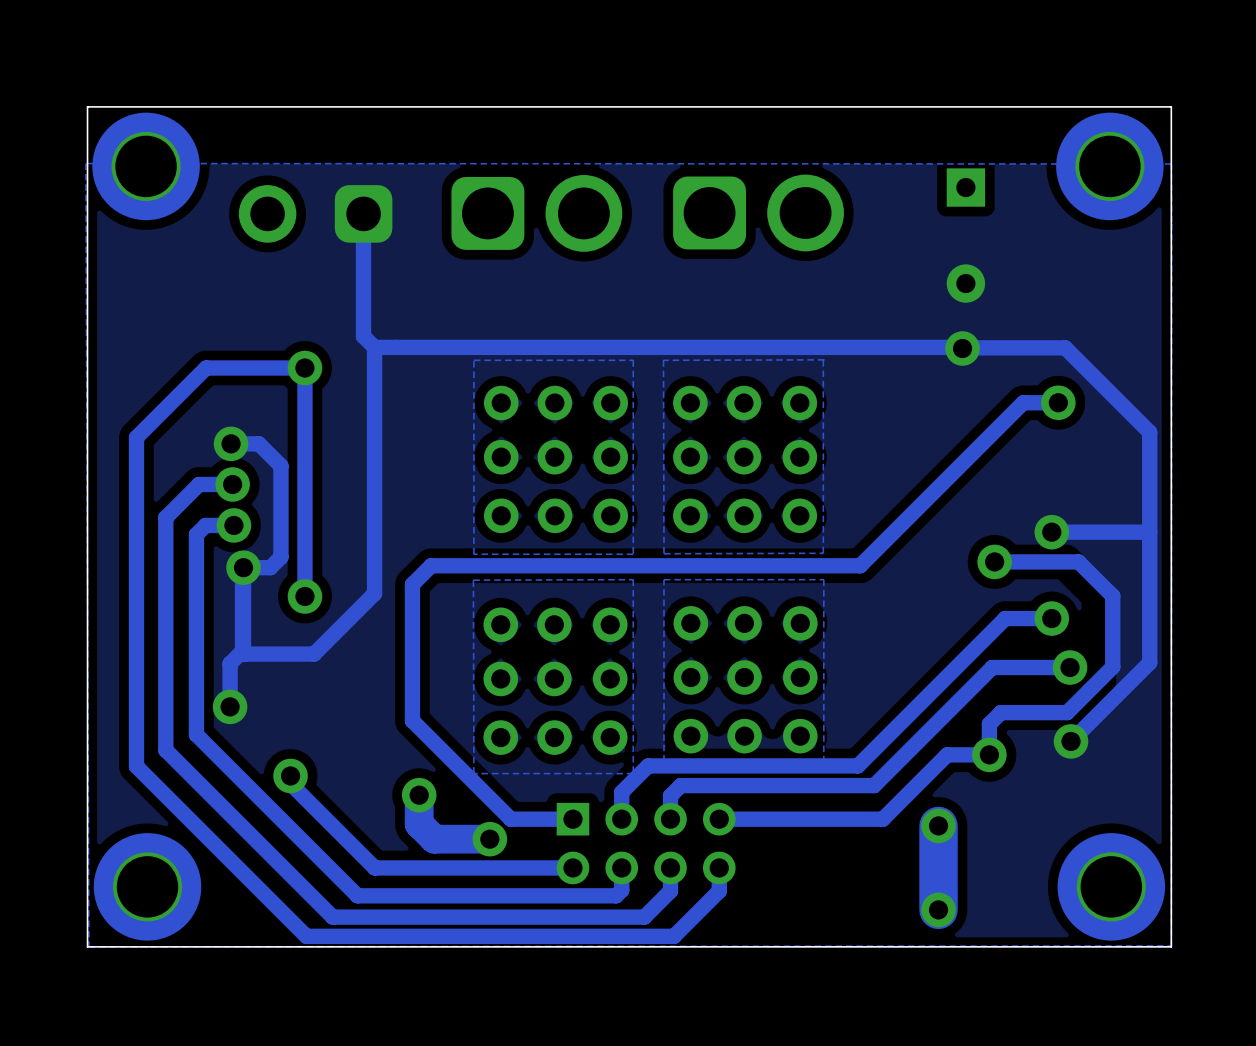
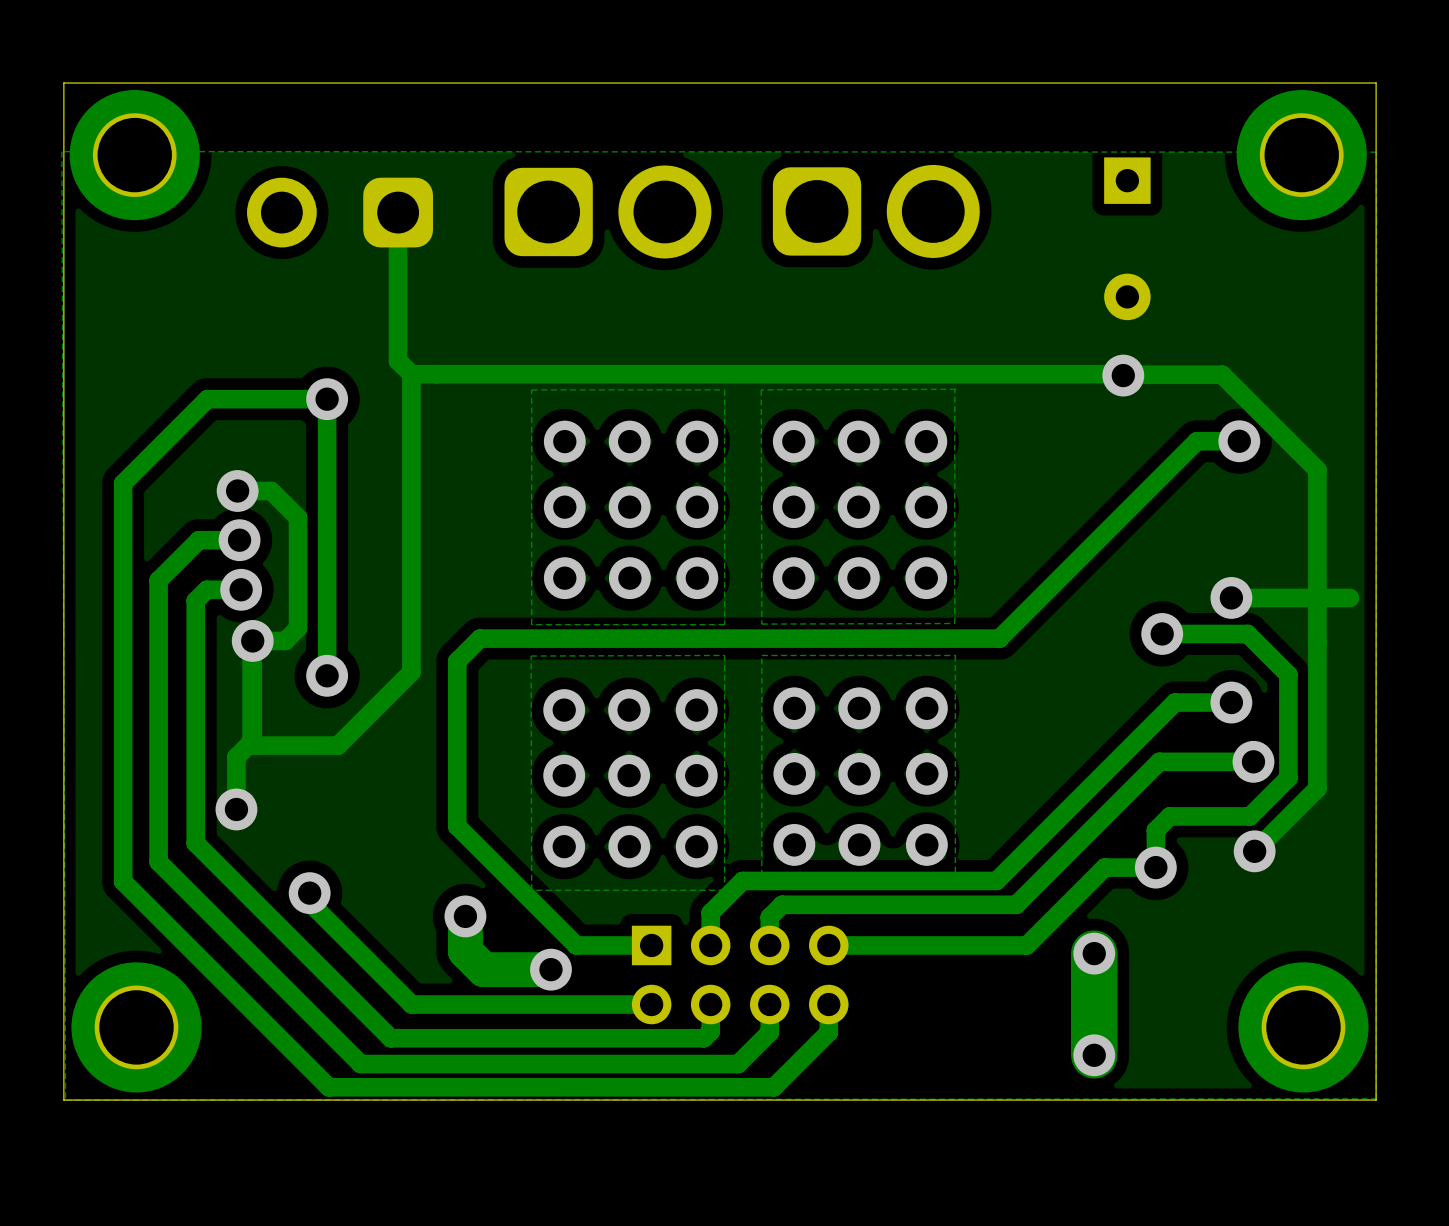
track: (1044, 347) (1065, 347) (1149, 432) (1149, 662) (1122, 689) -> (1222, 374) (1317, 469) (1317, 788)
track: (1065, 561) (1078, 561) (1112, 596) (1112, 667) (1098, 680) -> (1247, 633) (1288, 674) (1288, 778)

